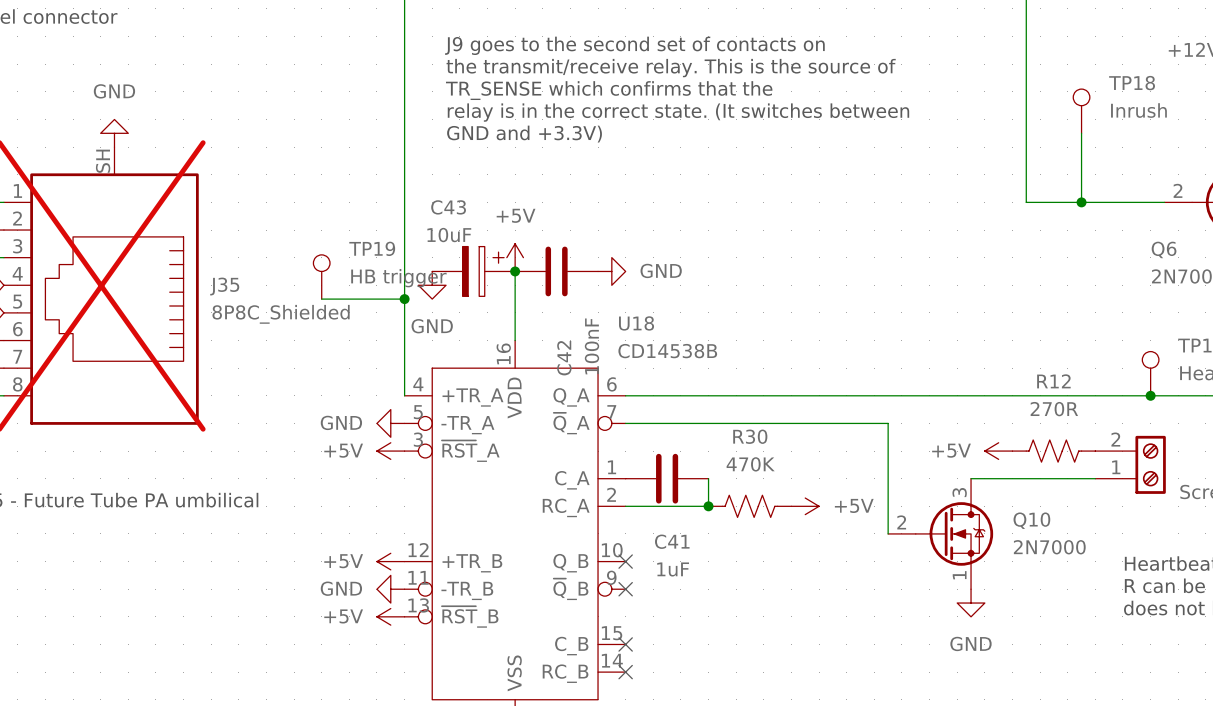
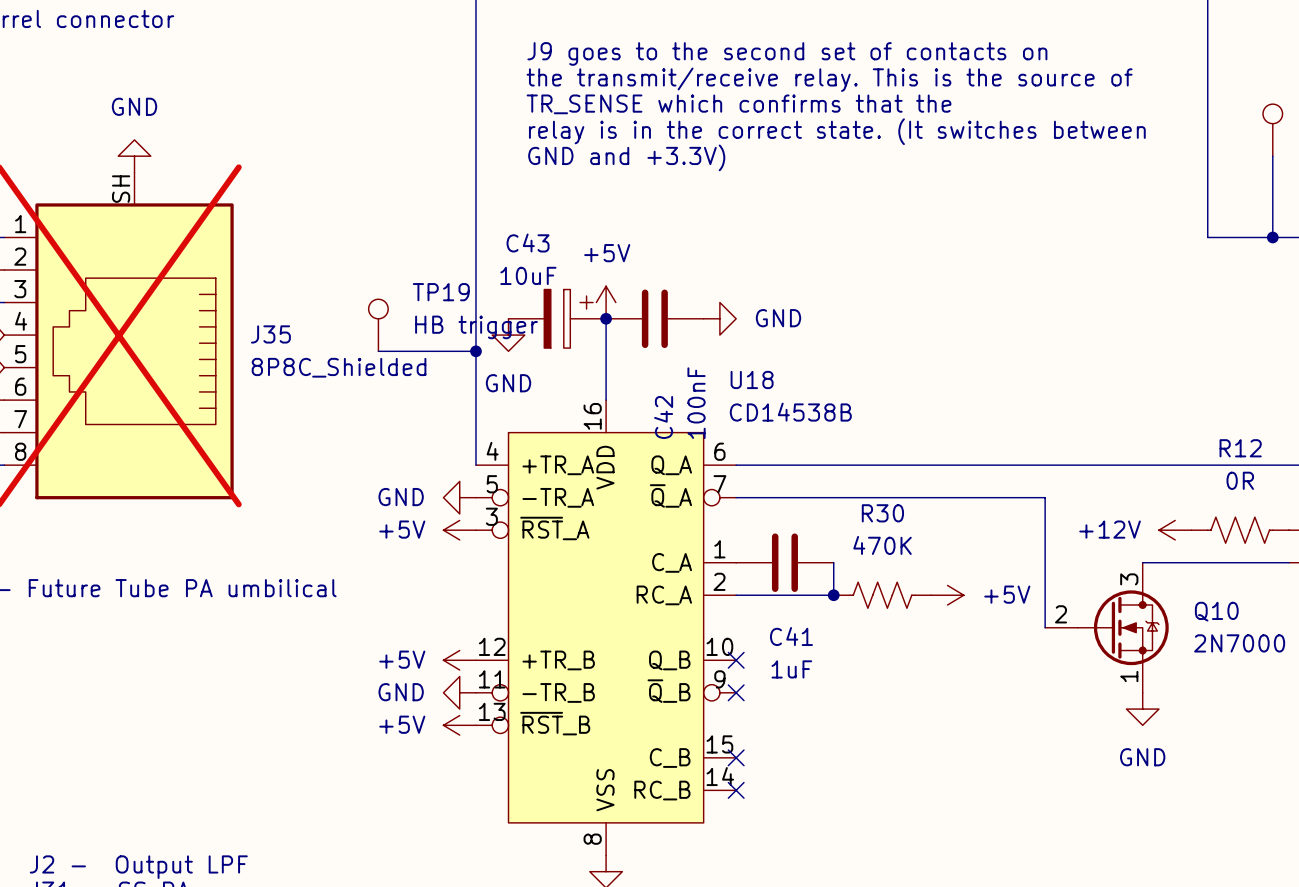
R12 value: 270R (1054, 409) -> 0R (1240, 480)
power symbol: +5V (998, 451) -> +12V (1175, 530)

